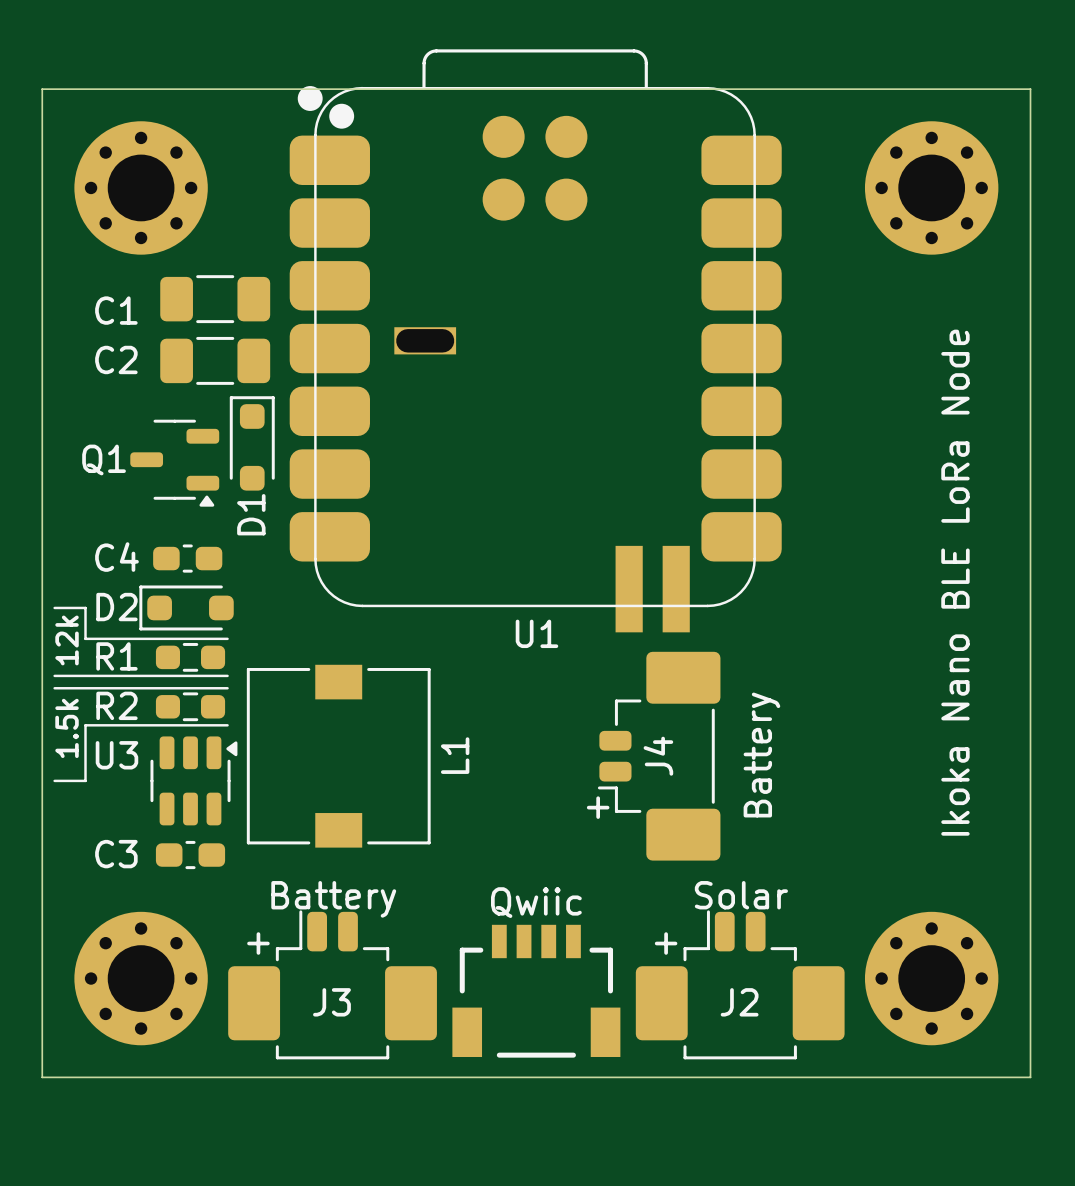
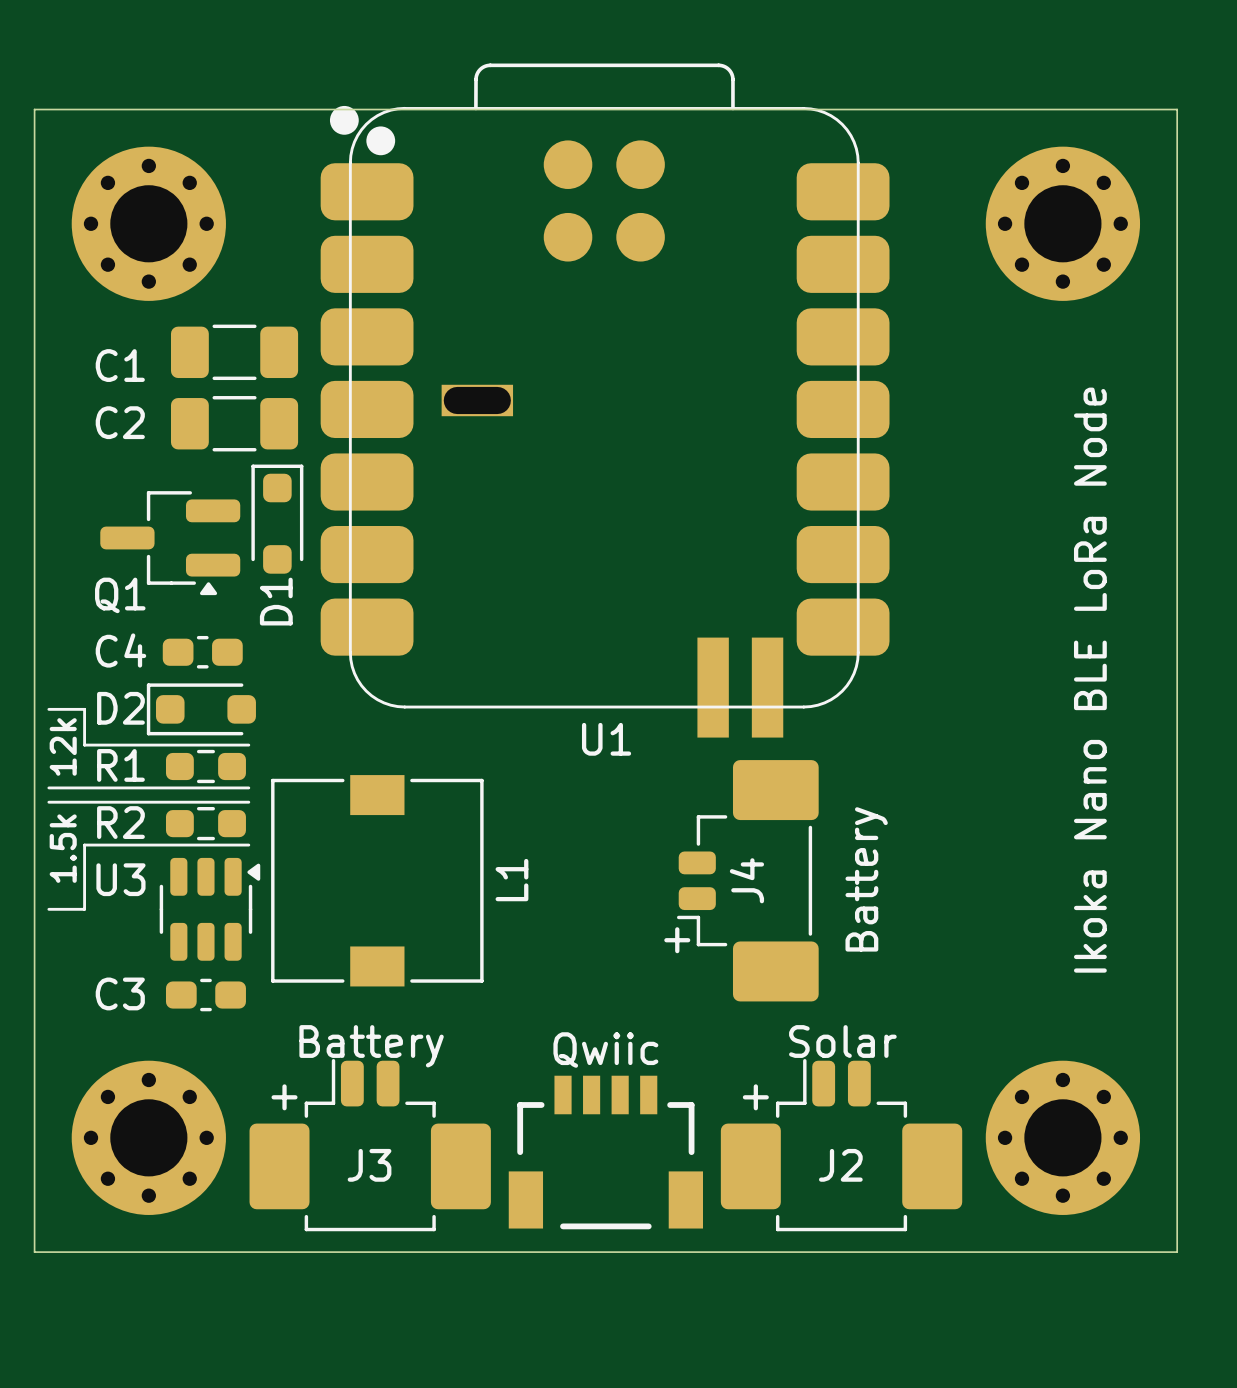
Q1 footprint: [130, 419, 220, 507] -> [100, 491, 241, 596]
Q1 name position: Q1 (104, 459) -> Q1 (120, 595)

